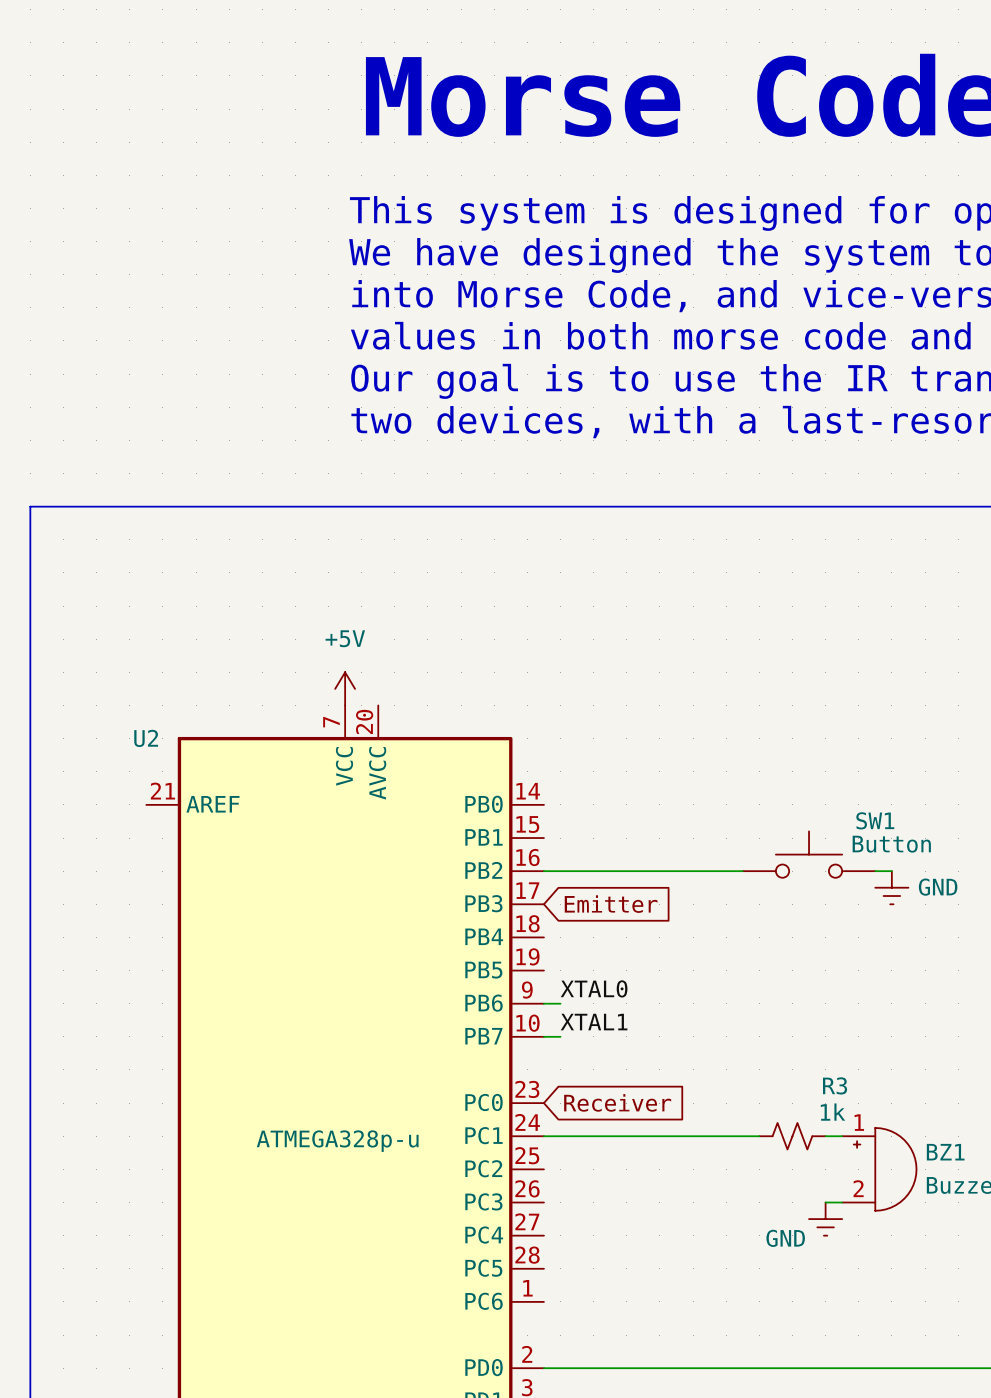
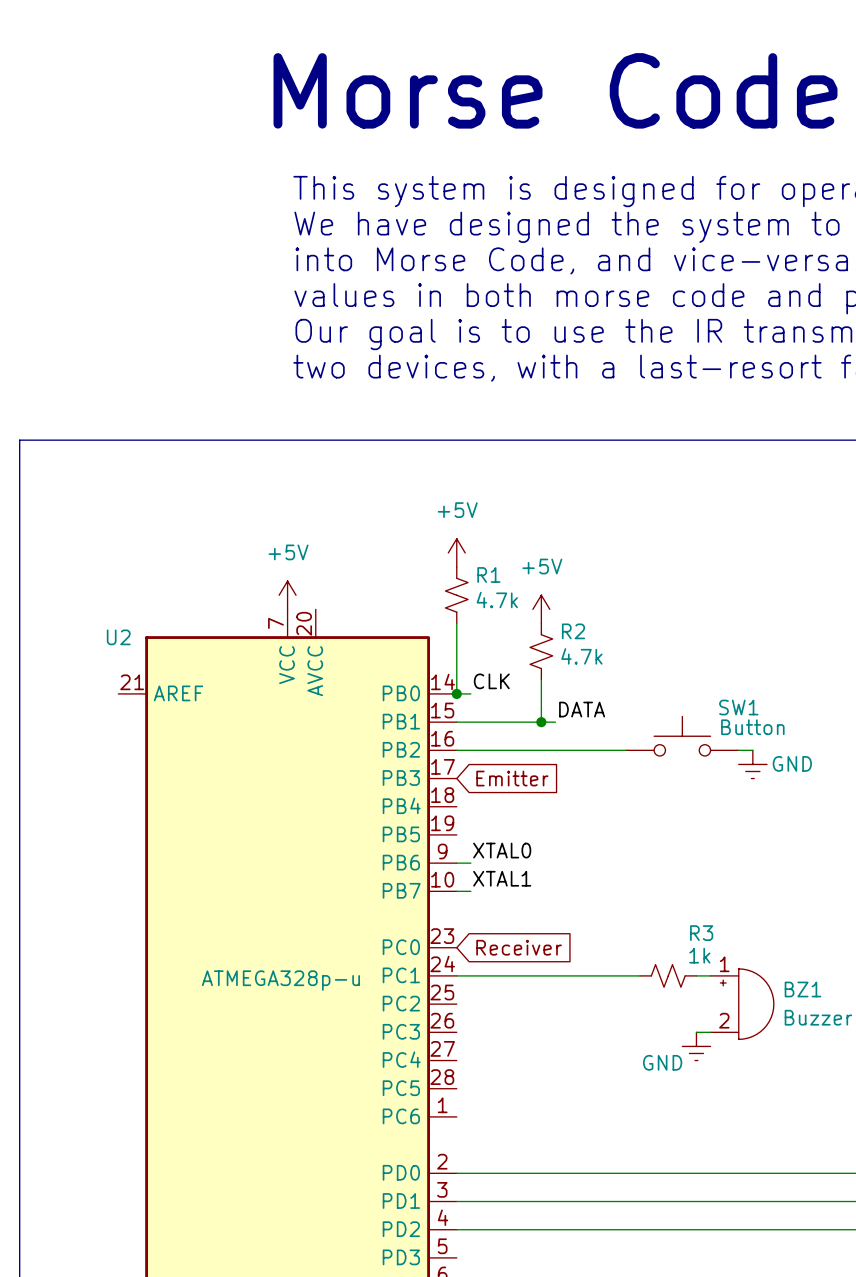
power symbol: none -> +5V (456, 552)
R1: none -> 4.7k (456, 595)
power symbol: none -> +5V (541, 609)
wire: none -> (456, 623) (456, 693) (470, 693)
R2: none -> 4.7k (541, 651)
wire: none -> (541, 679) (541, 722)
label: none -> CLK (491, 681)
junction: none -> (456, 693)
label: none -> DATA (582, 709)
wire: none -> (456, 722) (555, 722)
junction: none -> (541, 722)

